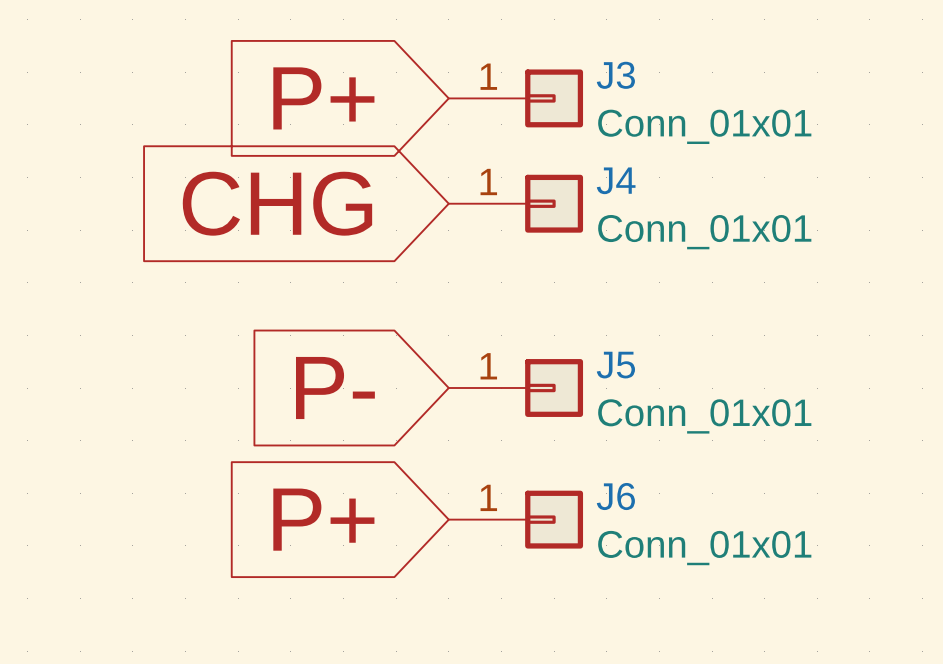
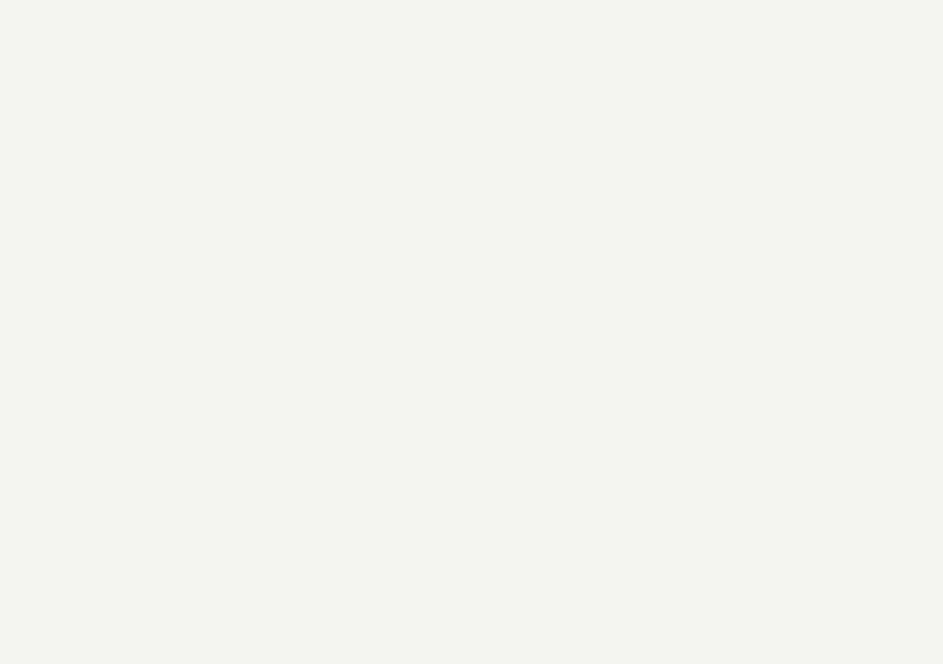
global label: P+ (323, 98) -> none
J3: Conn_01x01 (515, 98) -> none
global label: CHG (277, 203) -> none
J4: Conn_01x01 (515, 203) -> none
global label: P- (335, 388) -> none
J5: Conn_01x01 (515, 388) -> none
global label: P+ (323, 519) -> none
J6: Conn_01x01 (515, 519) -> none

